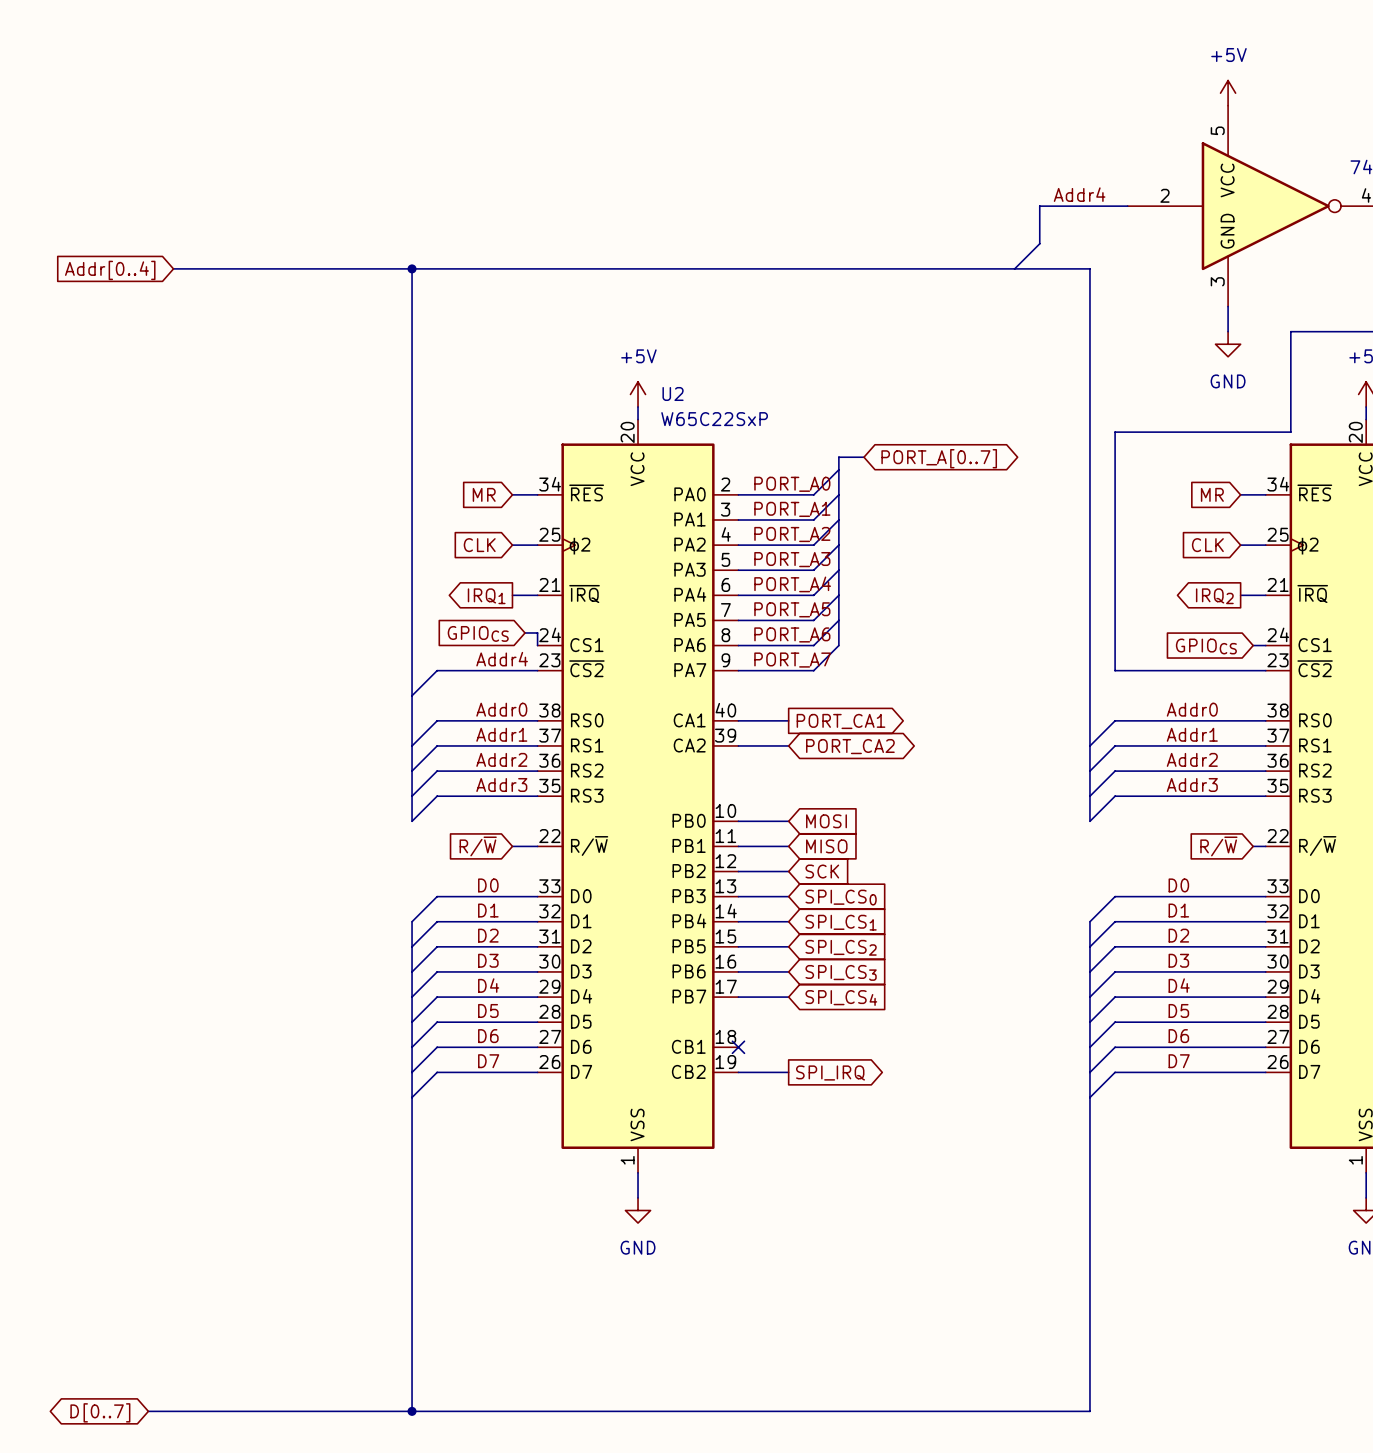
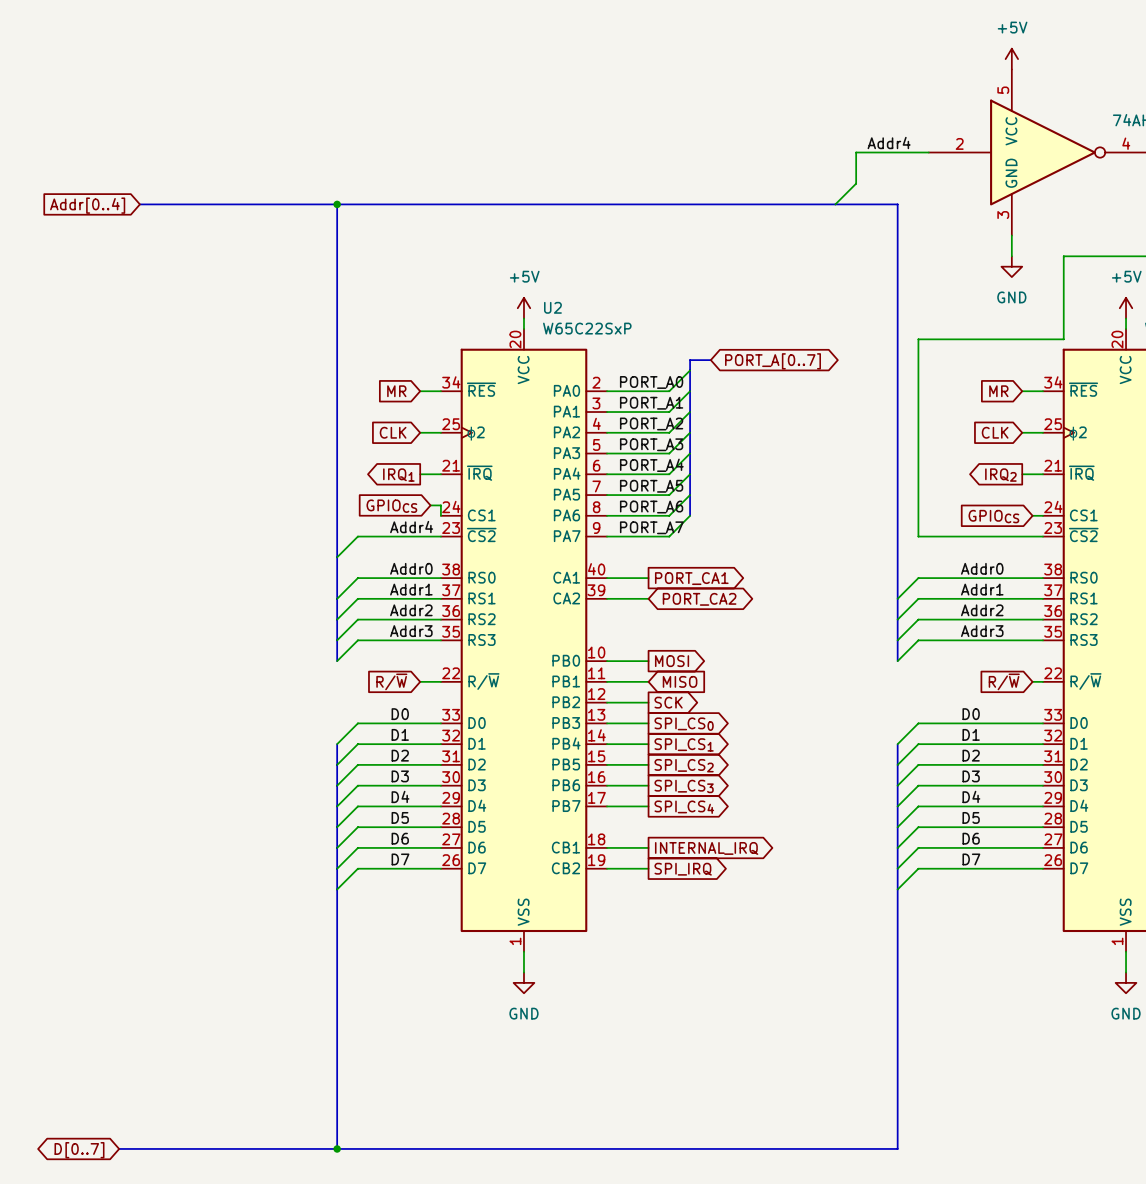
global label shape: input (826, 821) -> output (672, 661)
global label shape: input (822, 871) -> output (668, 702)
global label shape: input (841, 897) -> output (684, 724)
global label shape: input (841, 922) -> output (684, 744)
global label shape: input (841, 947) -> output (684, 765)
global label shape: input (841, 972) -> output (684, 786)
global label shape: input (841, 998) -> output (684, 807)
wire: none -> (607, 847) (648, 847)
no-connect mark: (738, 1047) -> none
global label: none -> INTERNAL_IRQ (706, 848)

